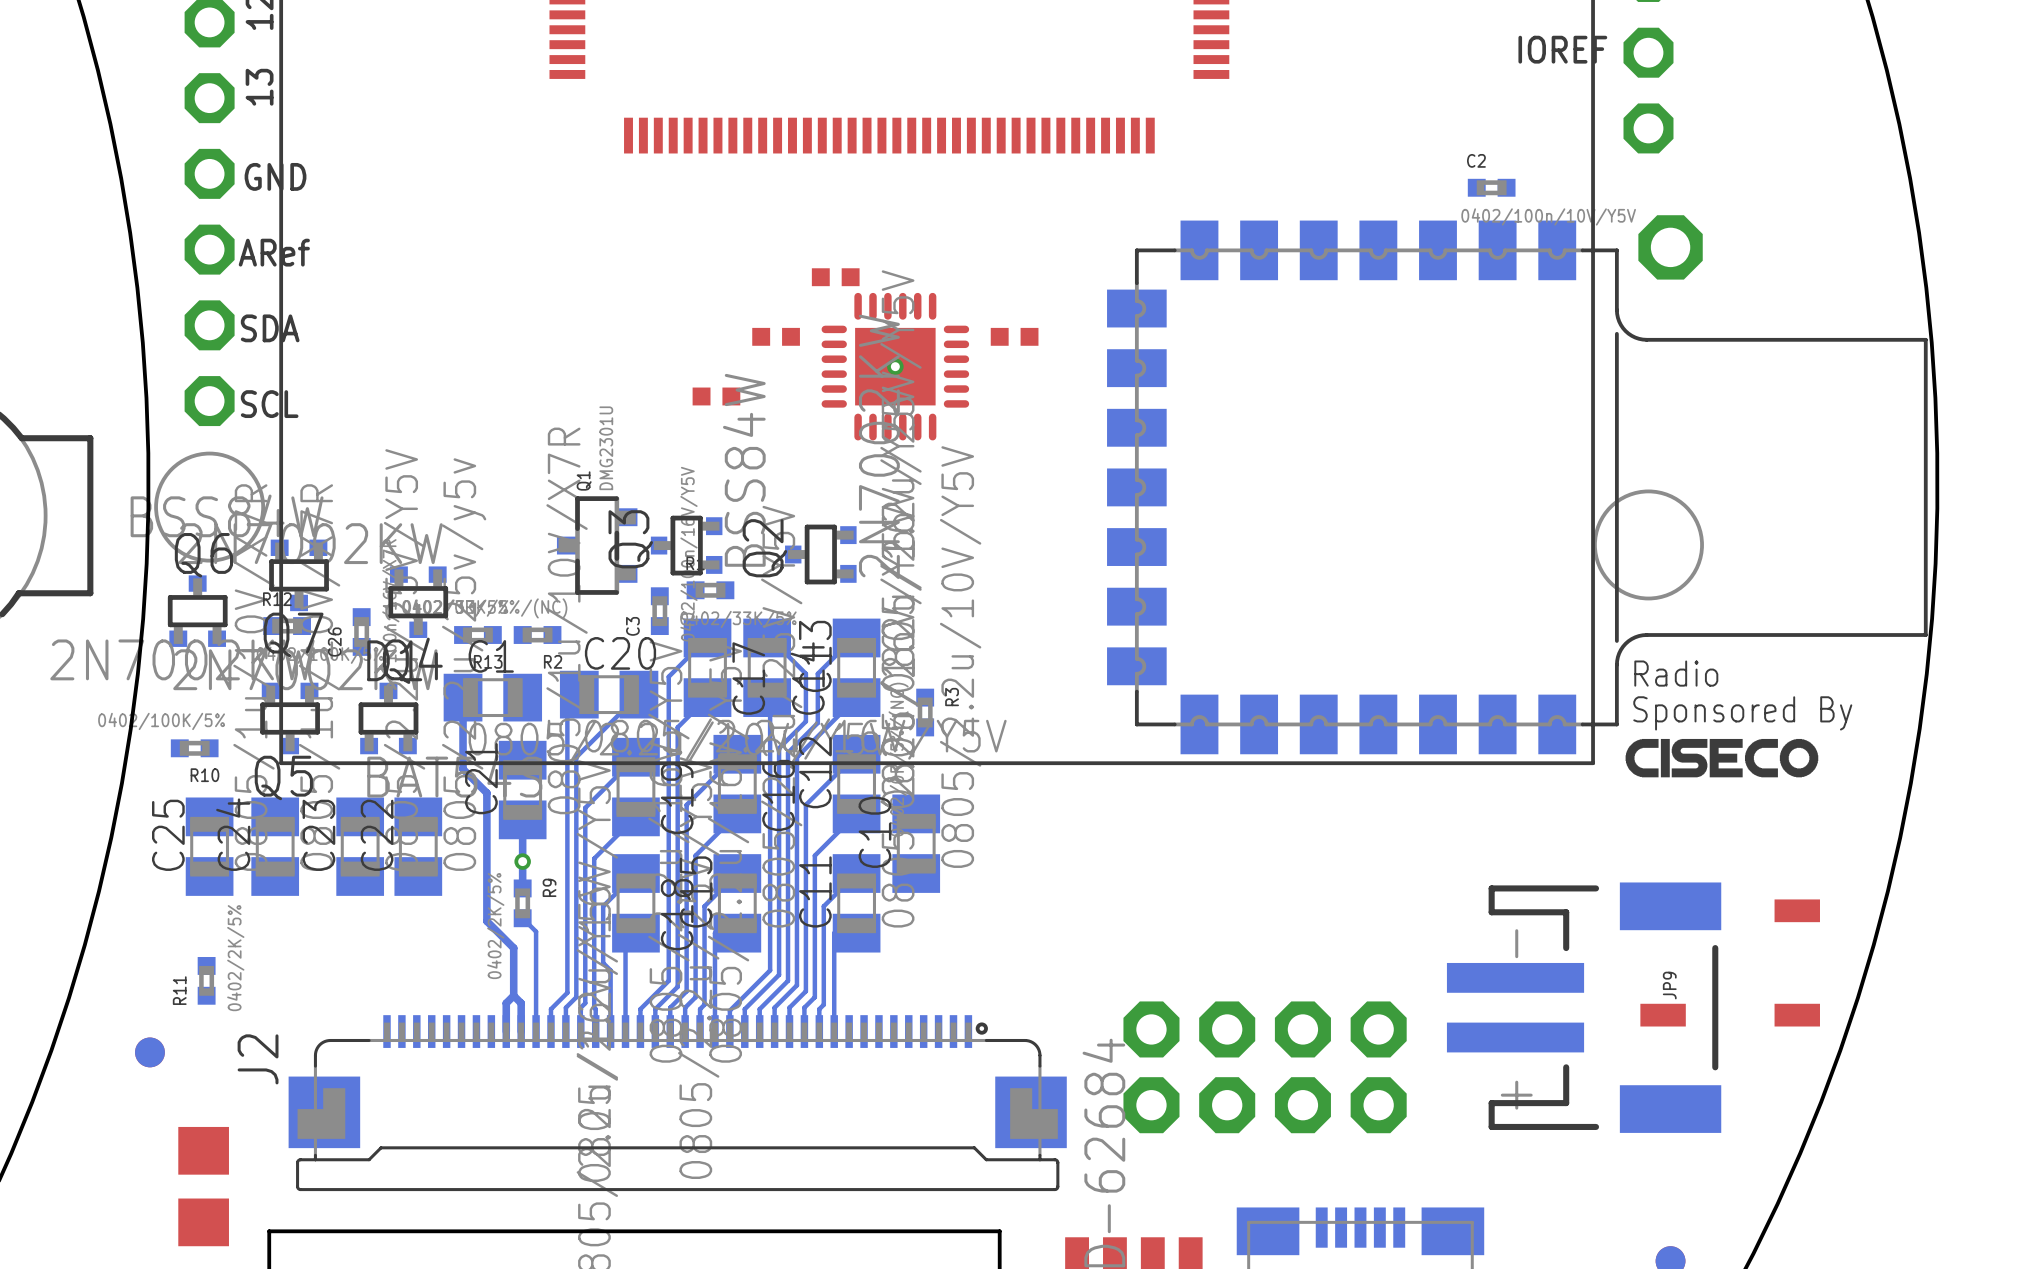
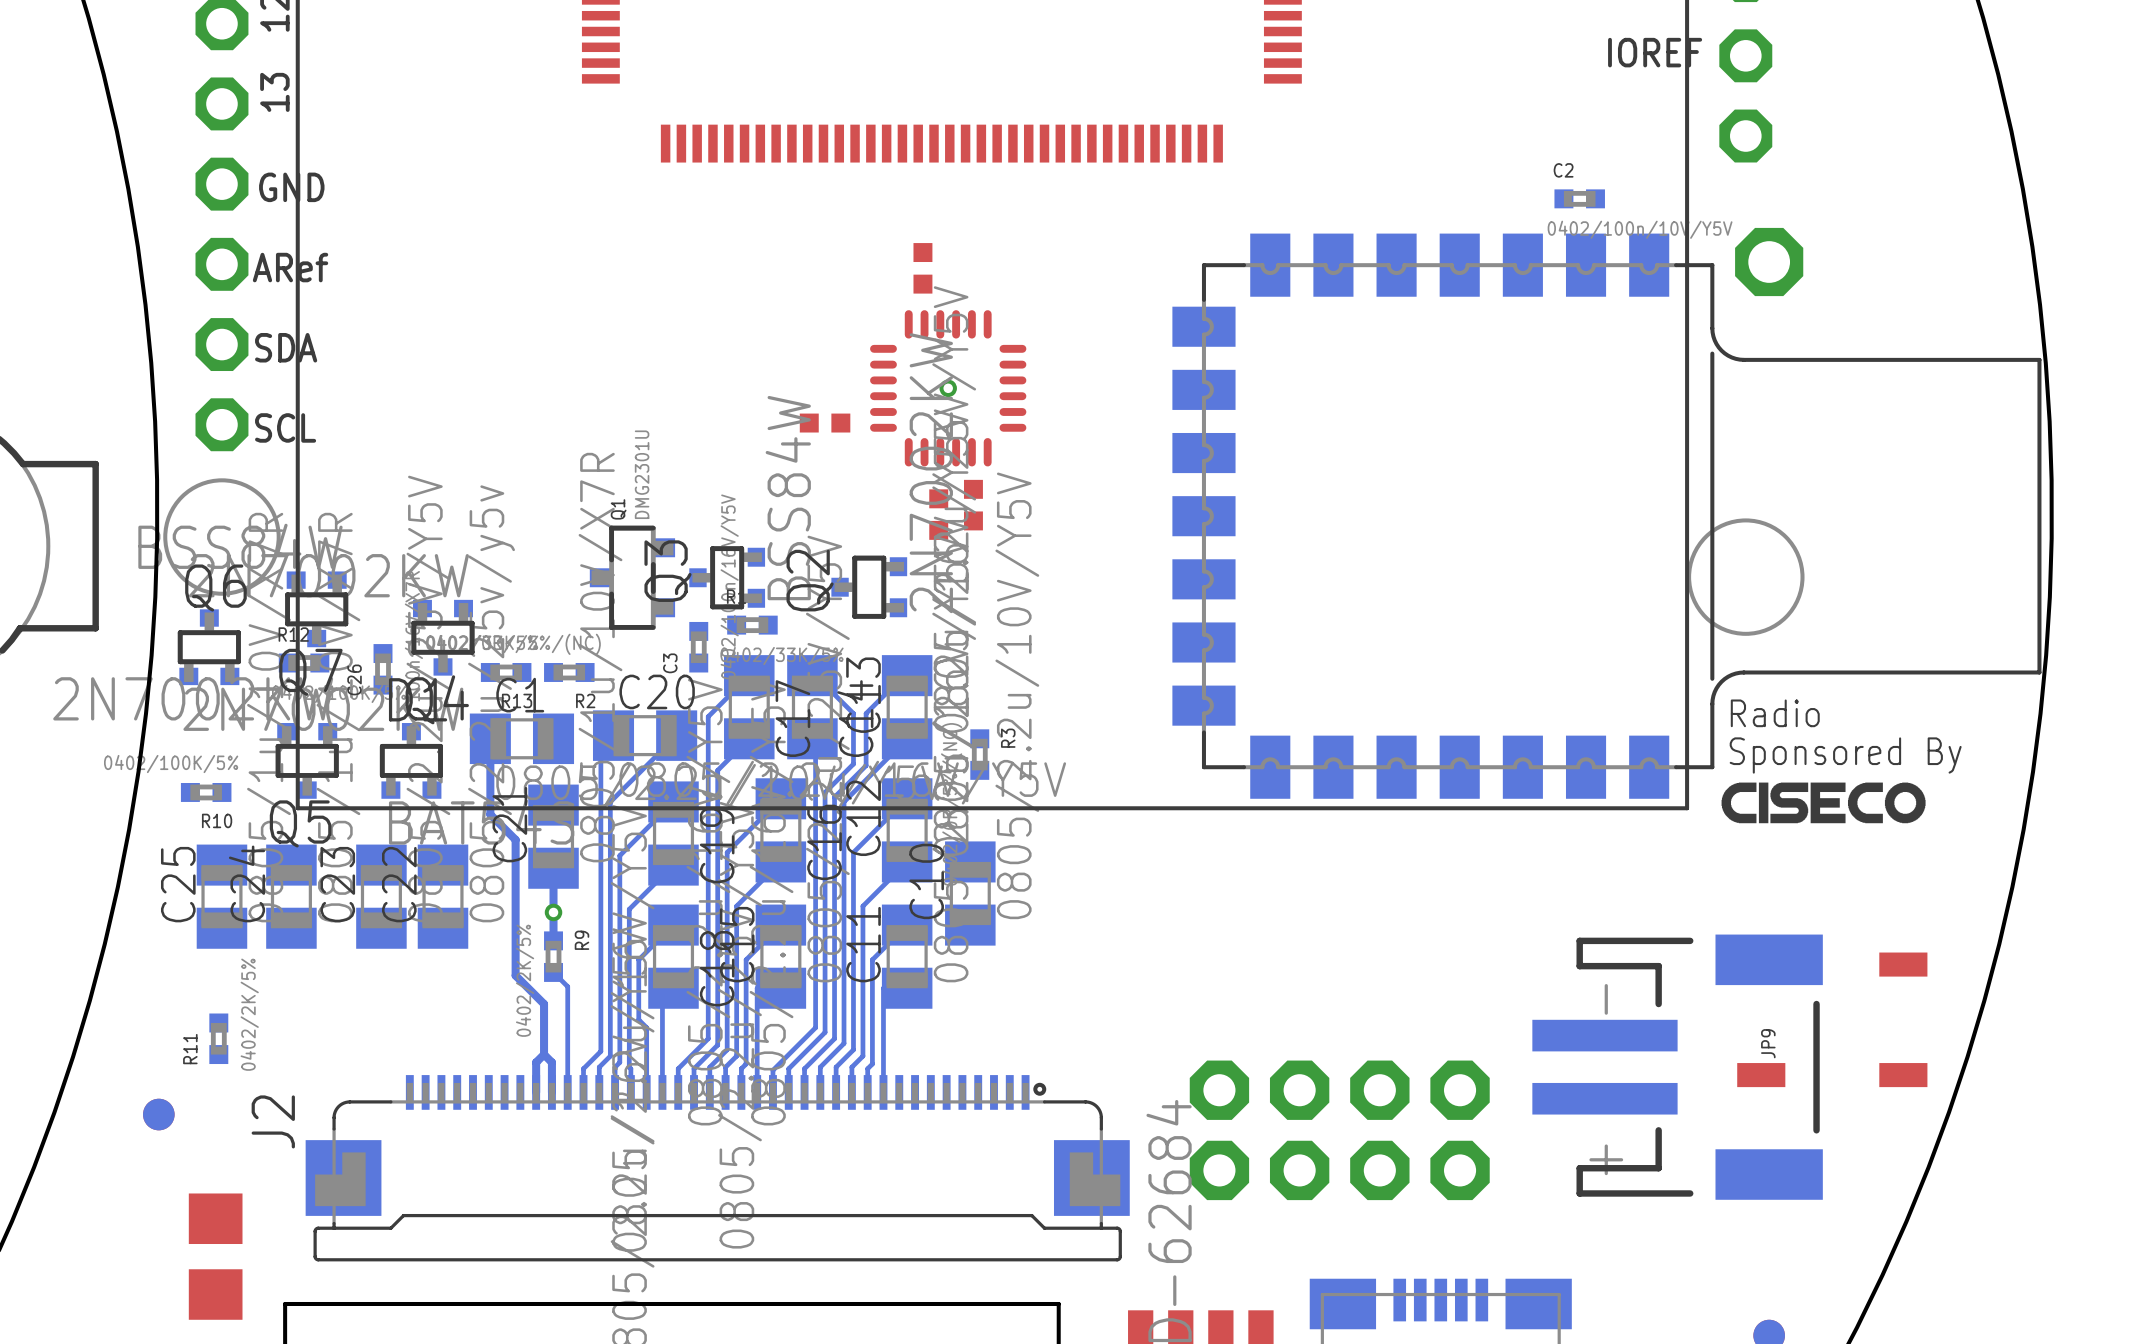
part rotation: 0° (835, 277) -> 90° clockwise (922, 268)
part position: (835, 277) -> (922, 268)
part footprint: [821, 292, 970, 441] -> [870, 310, 1027, 467]
part: (776, 336) -> none
part: (1014, 336) -> none
part: (716, 396) -> none
part: none -> (825, 423)
part: none -> (973, 505)
part: none -> (938, 514)

